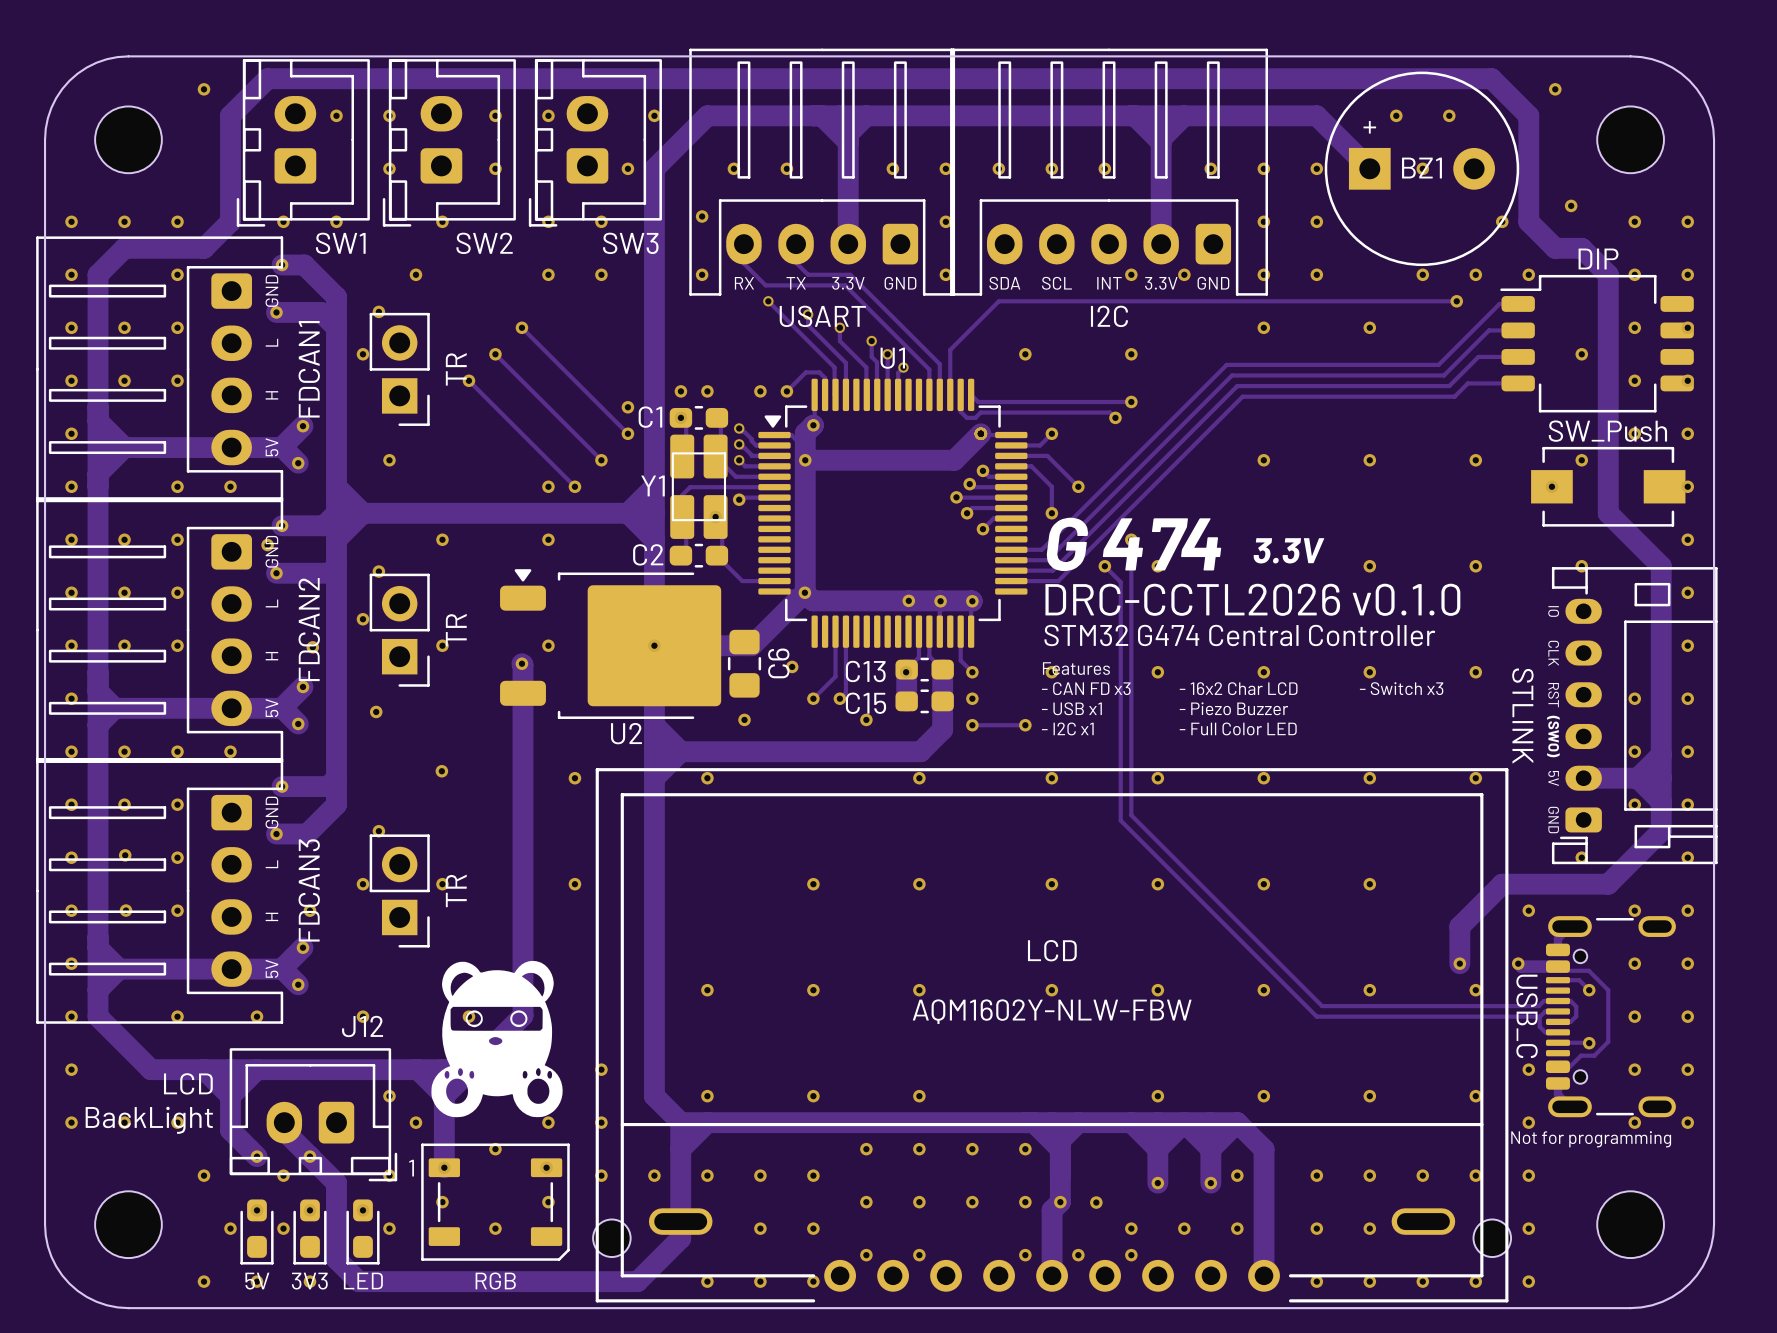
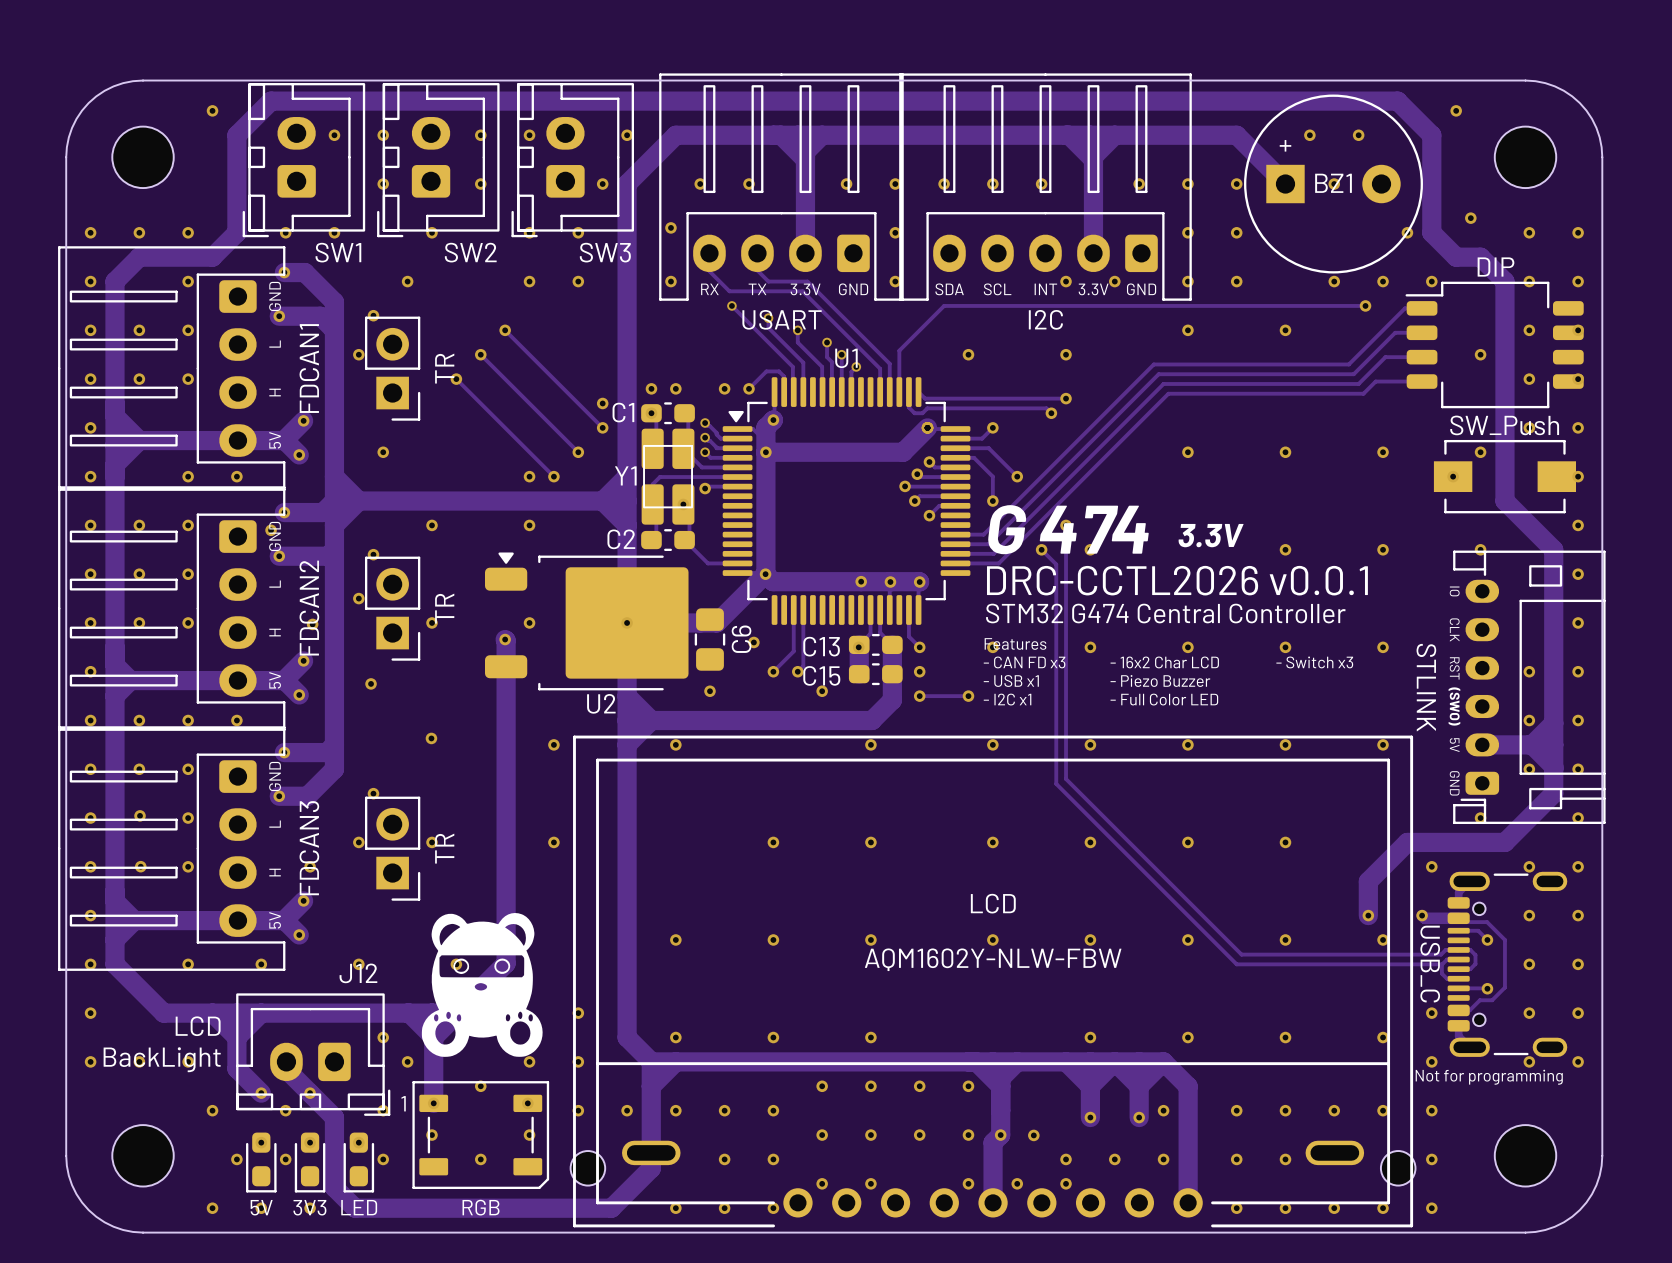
text: DRC-CCTL2026 v0.1.0 (1252, 599) -> DRC-CCTL2026 v0.0.1 (1177, 580)

